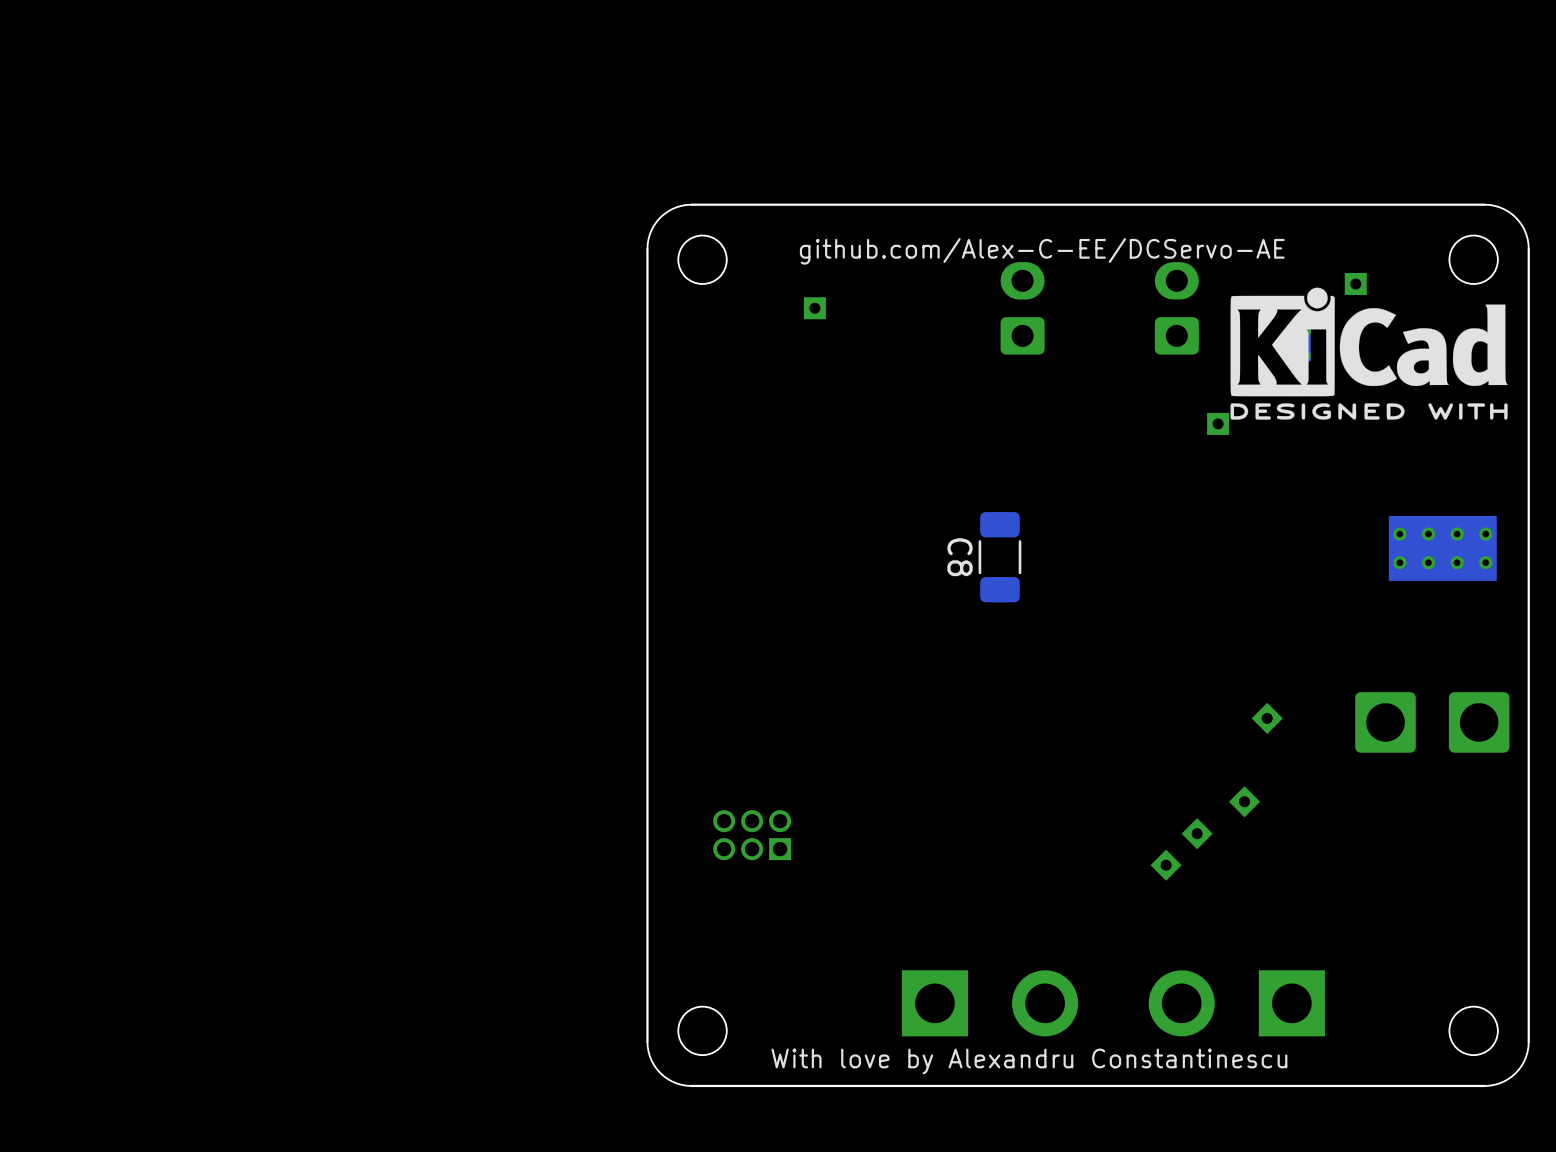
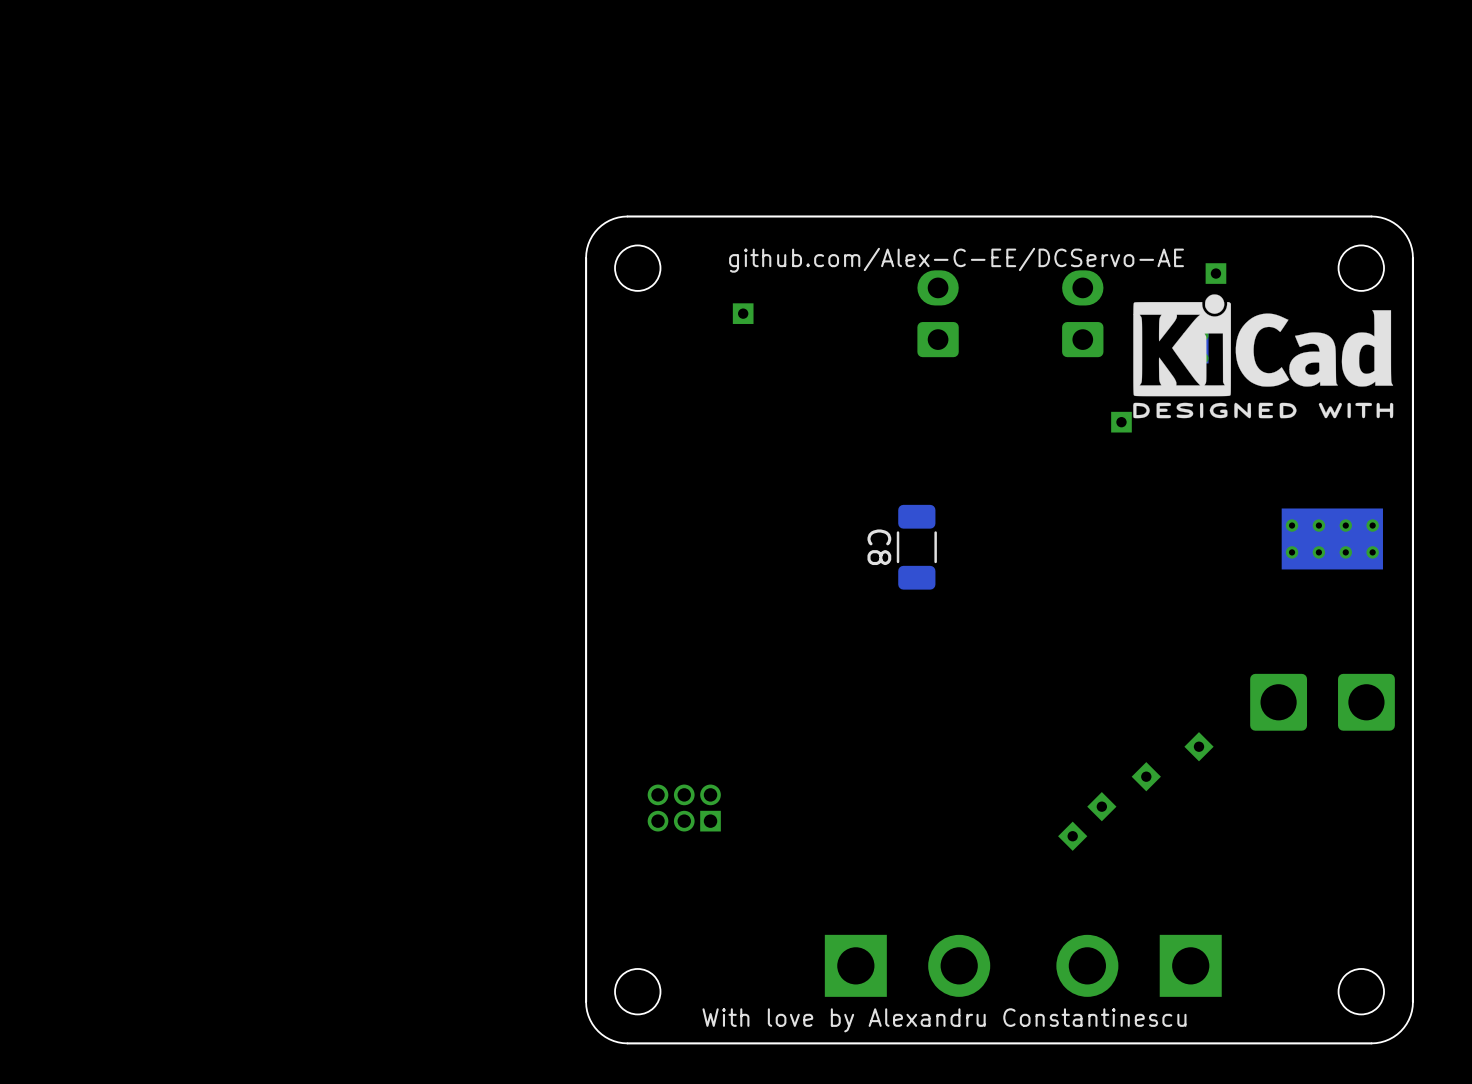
part position: (1355, 284) -> (1215, 273)
part position: (1267, 718) -> (1199, 746)

